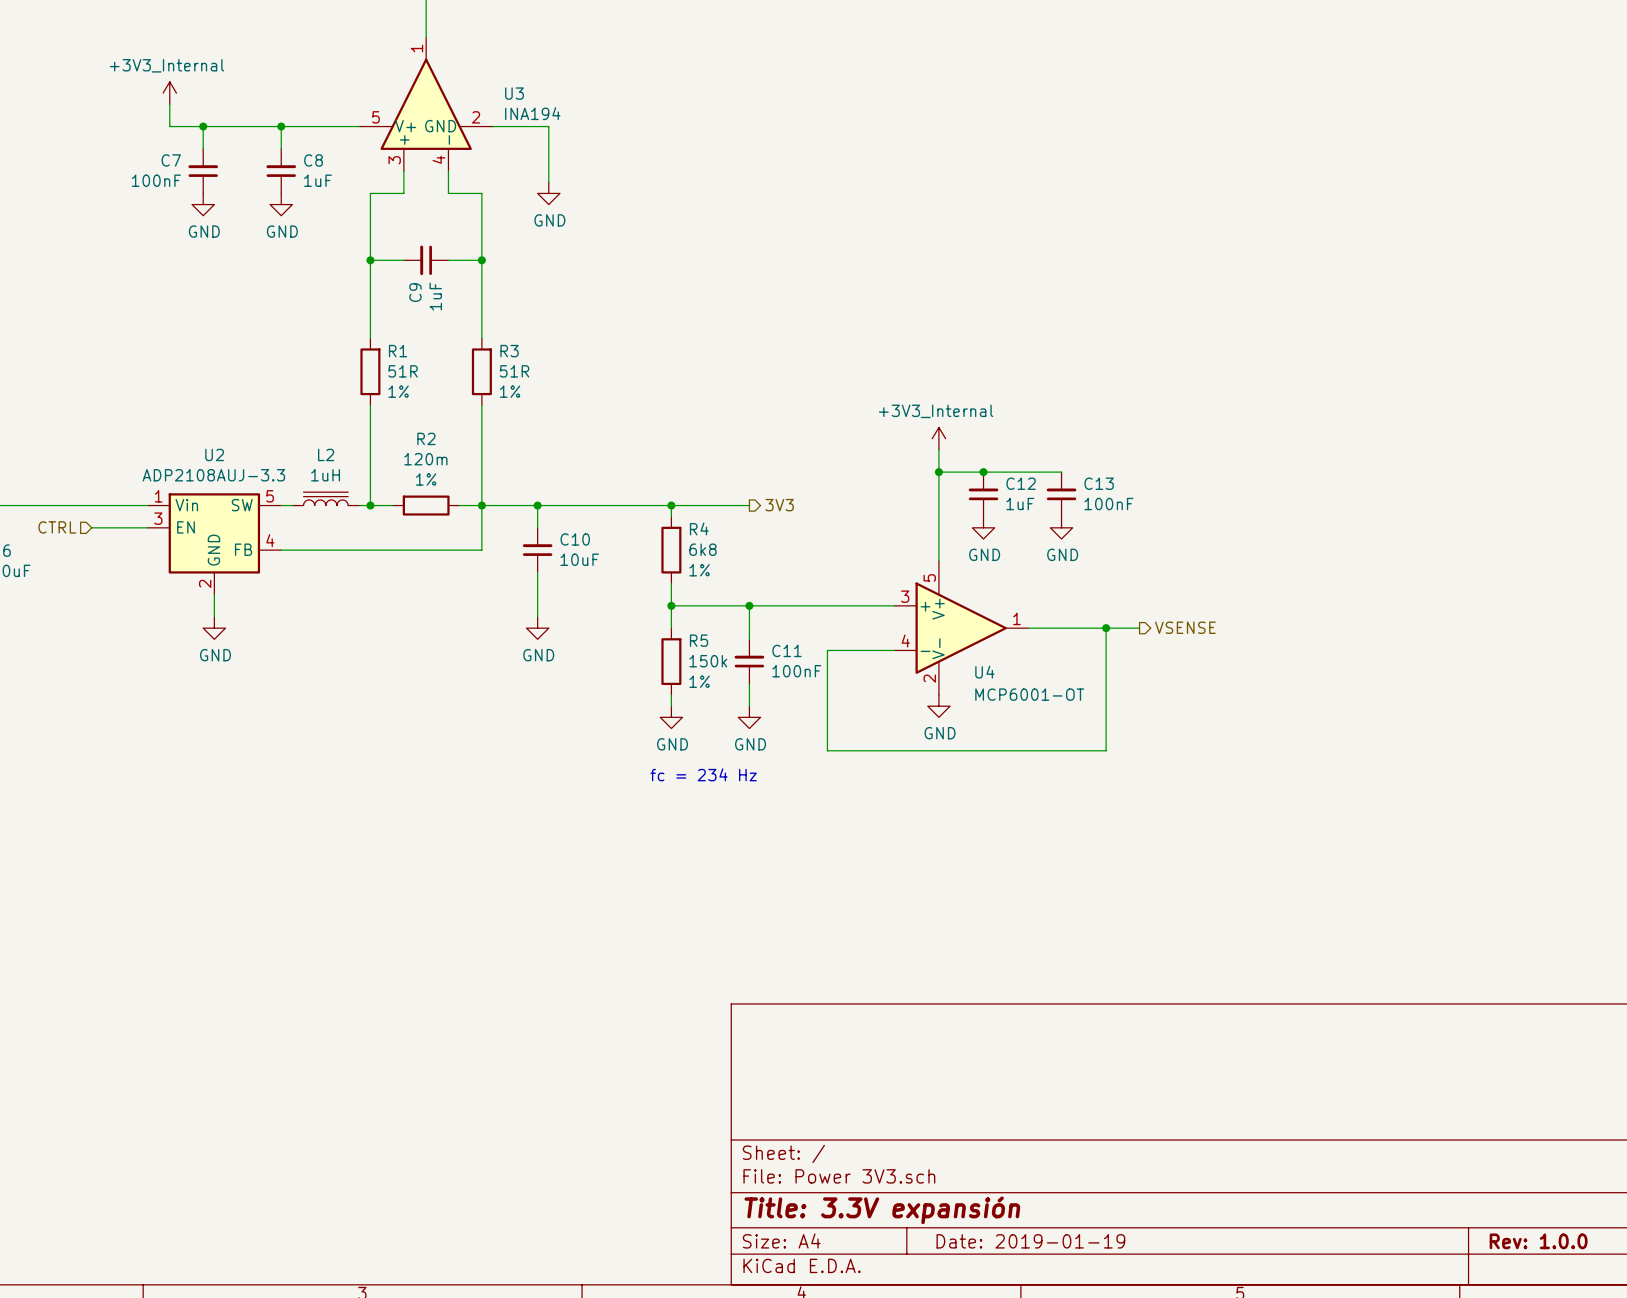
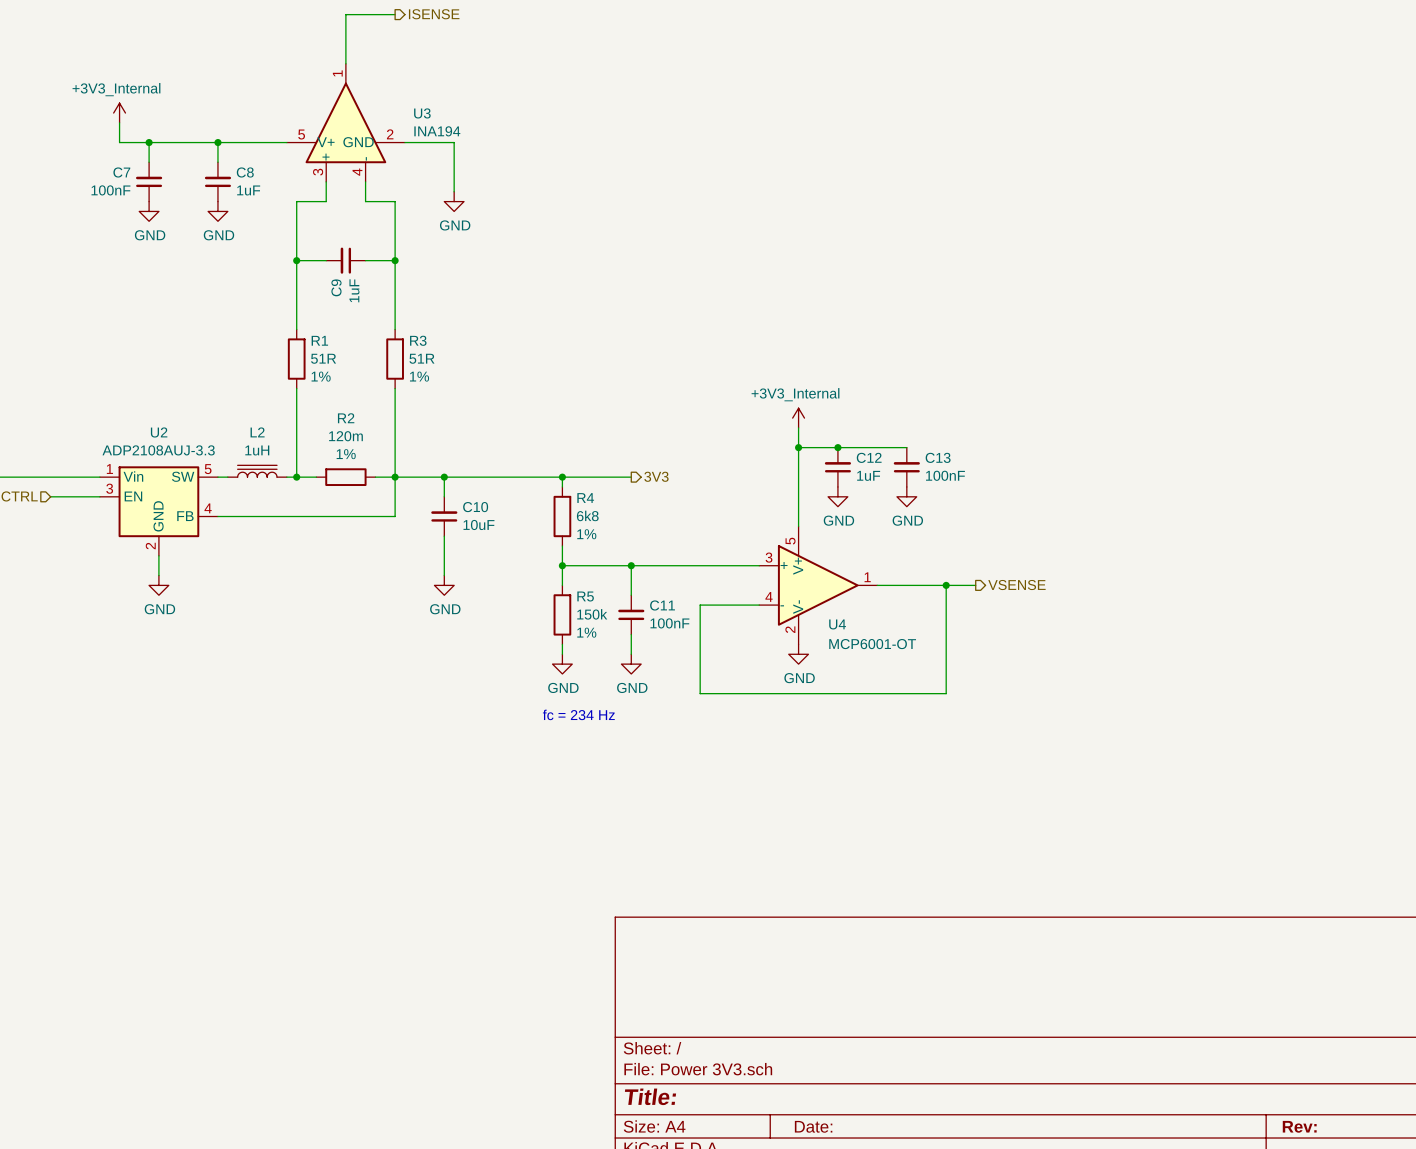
title block: Title: 3.3V expansión (882, 1210) -> Title: (650, 1096)
title block: Date: 2019-01-19 (1030, 1241) -> Date: (813, 1126)
title block: Rev: 1.0.0 (1538, 1241) -> Rev: (1299, 1126)

